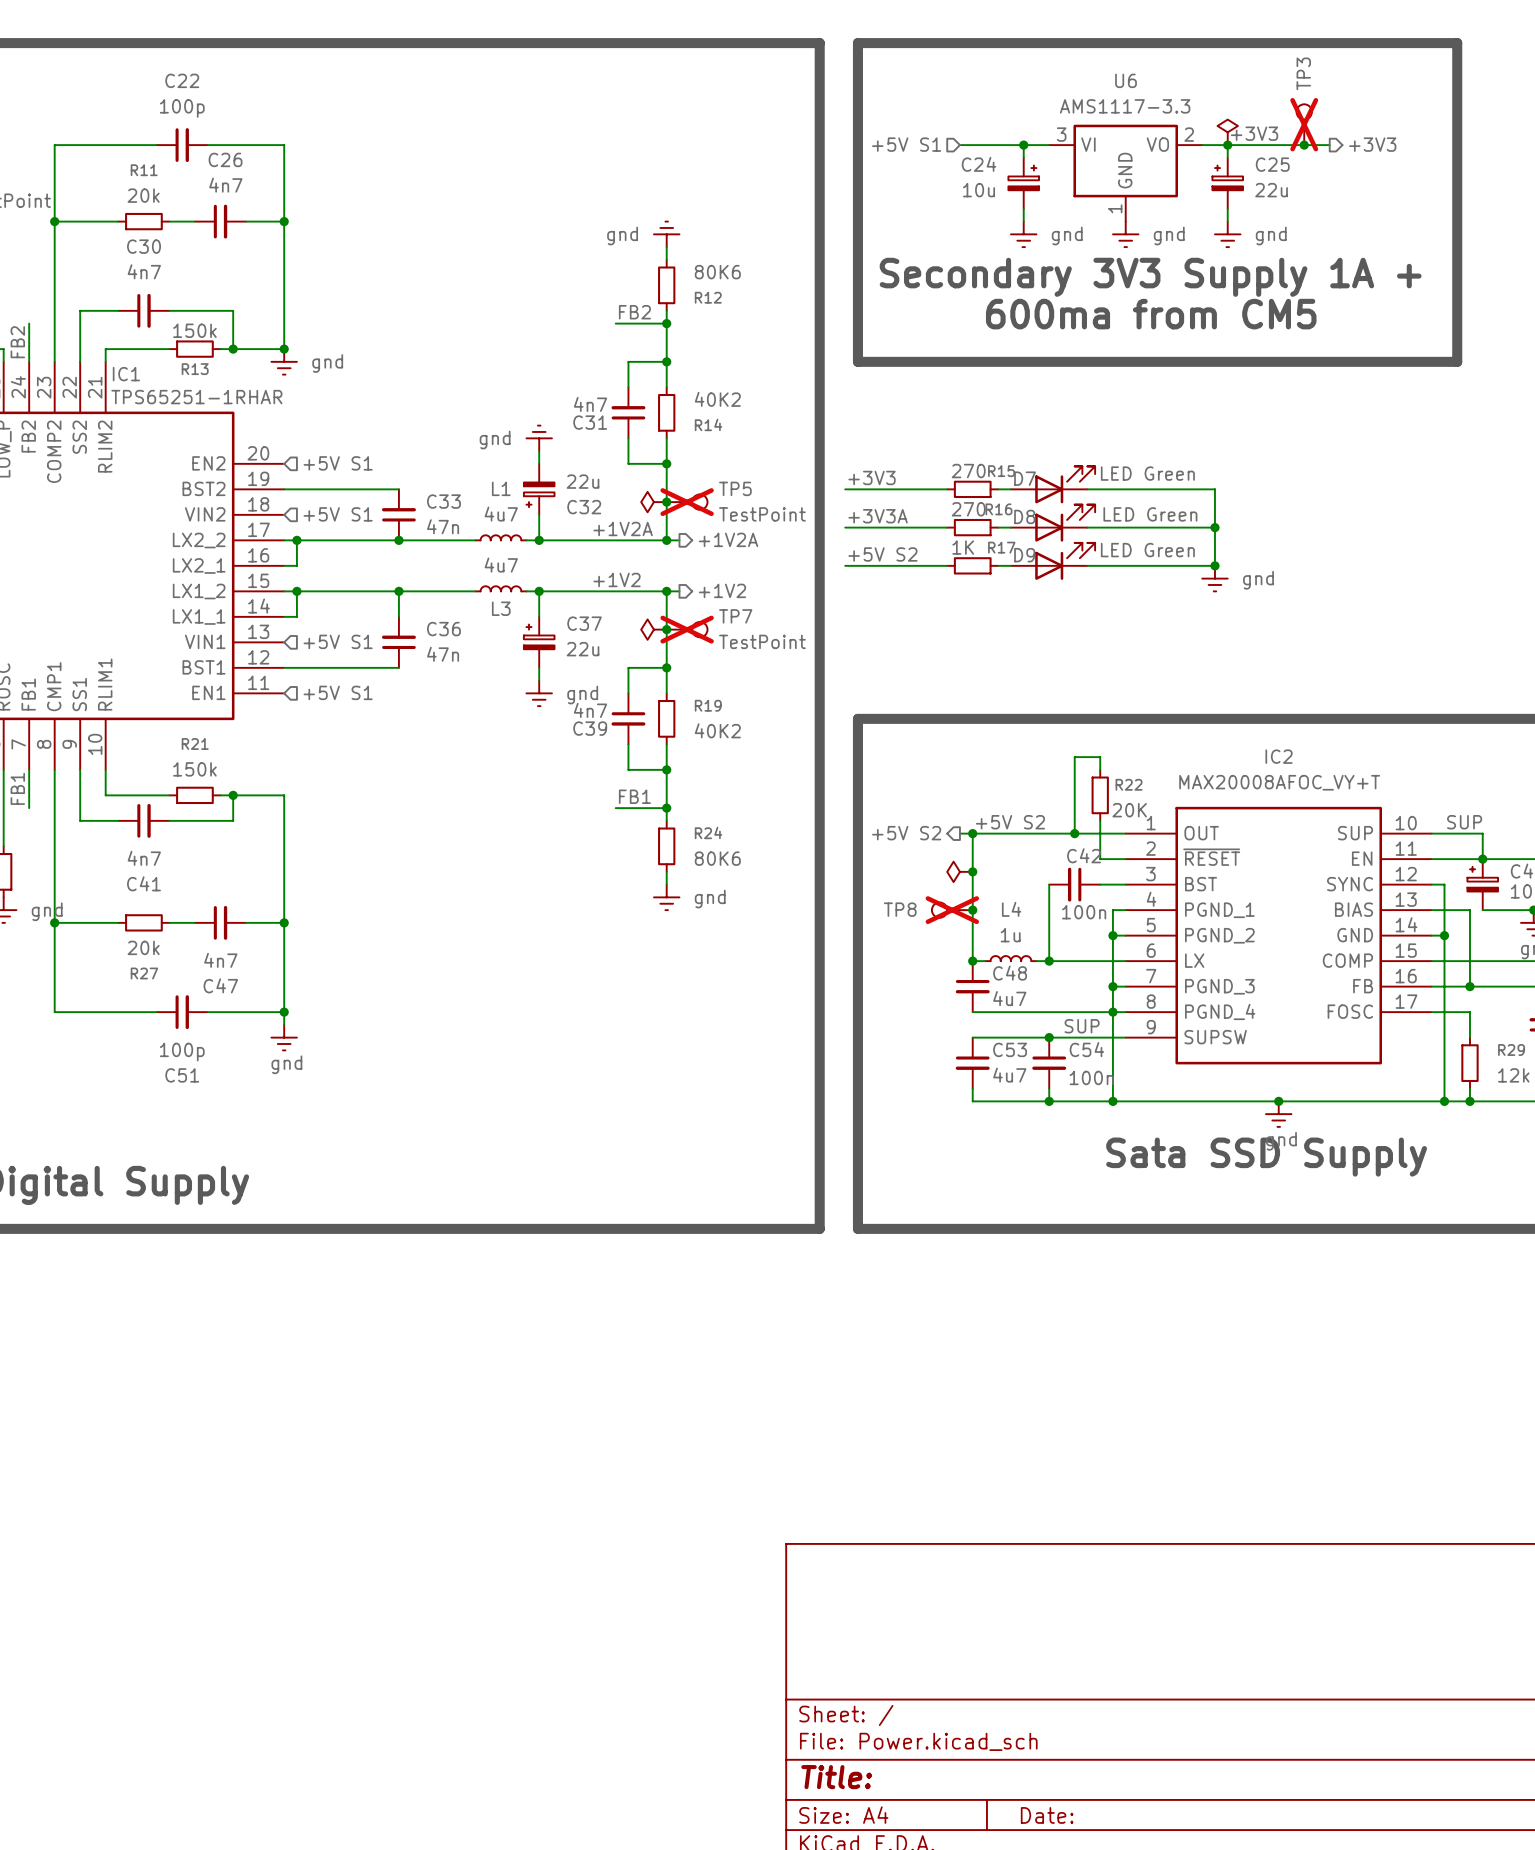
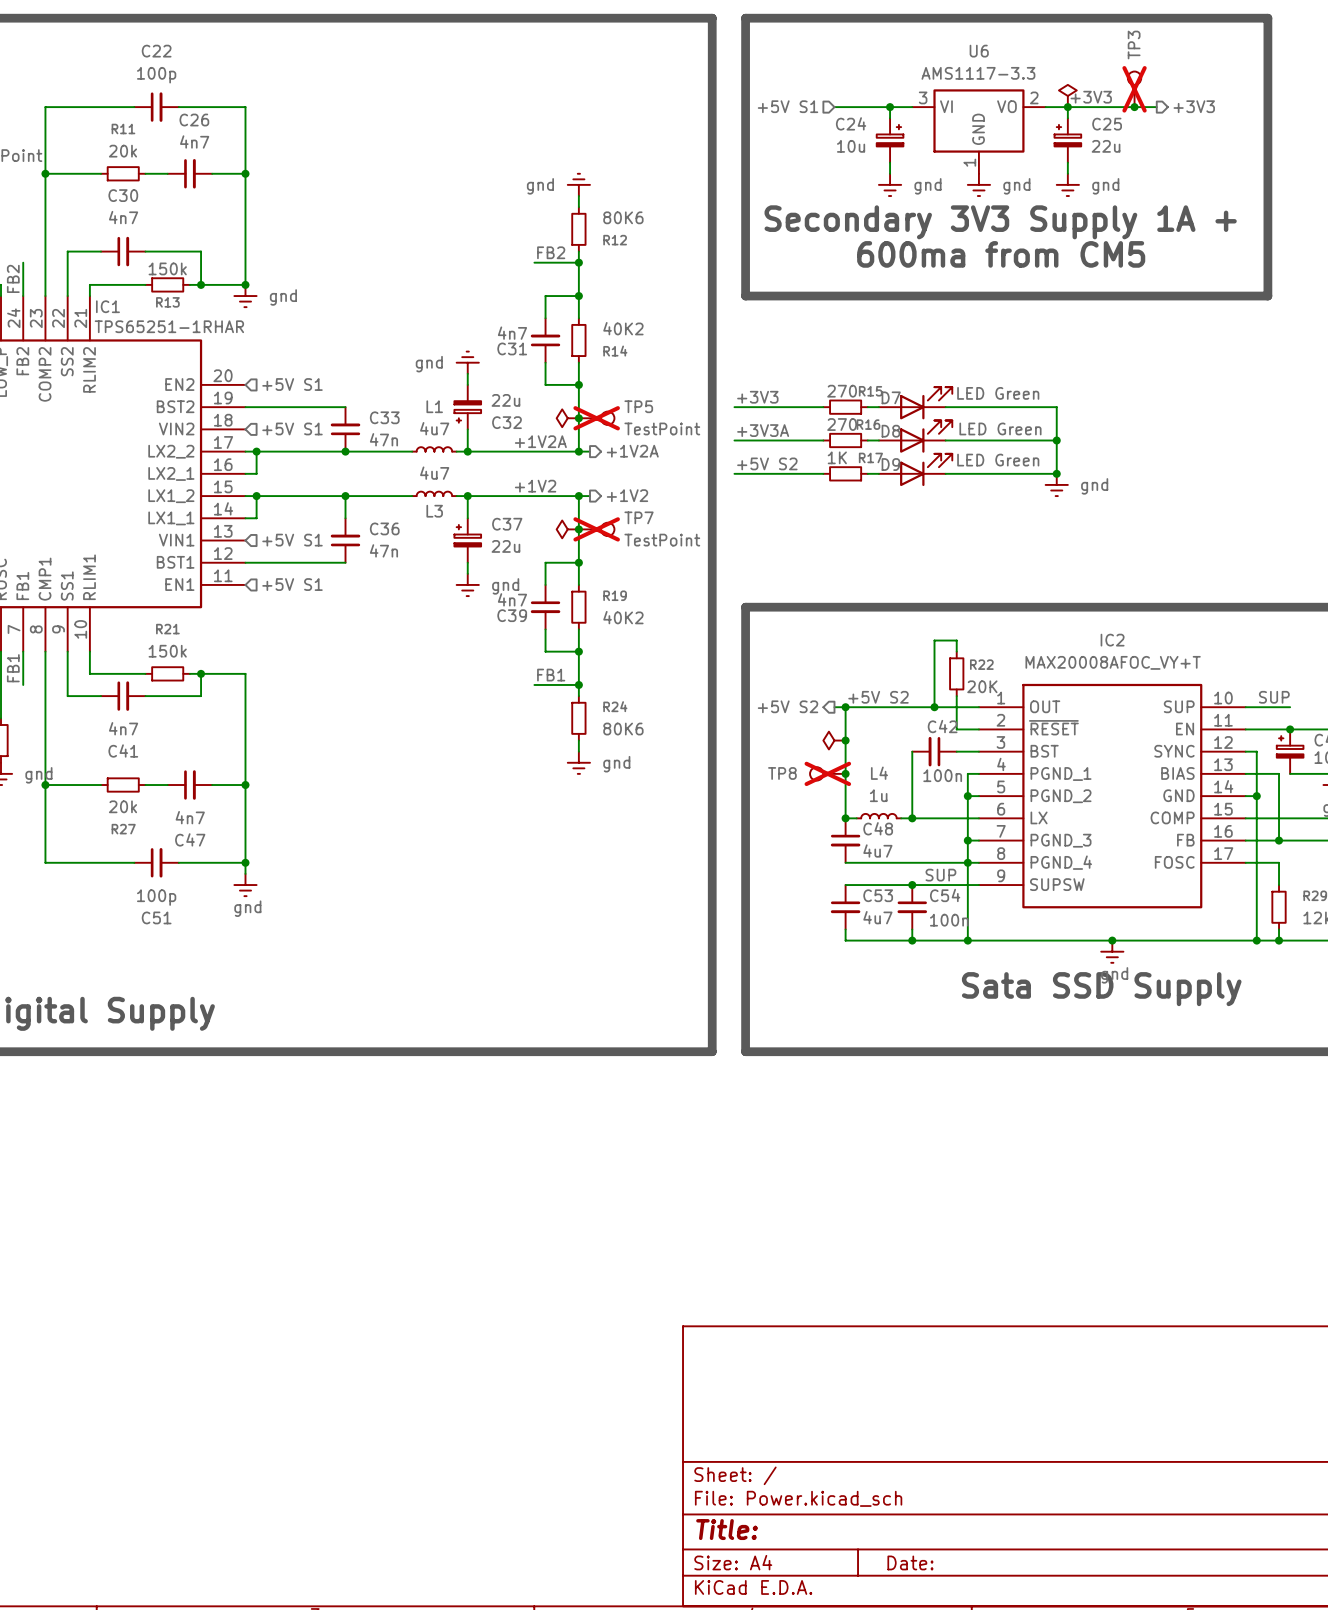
wire: (1482, 833) (1482, 859) -> none

